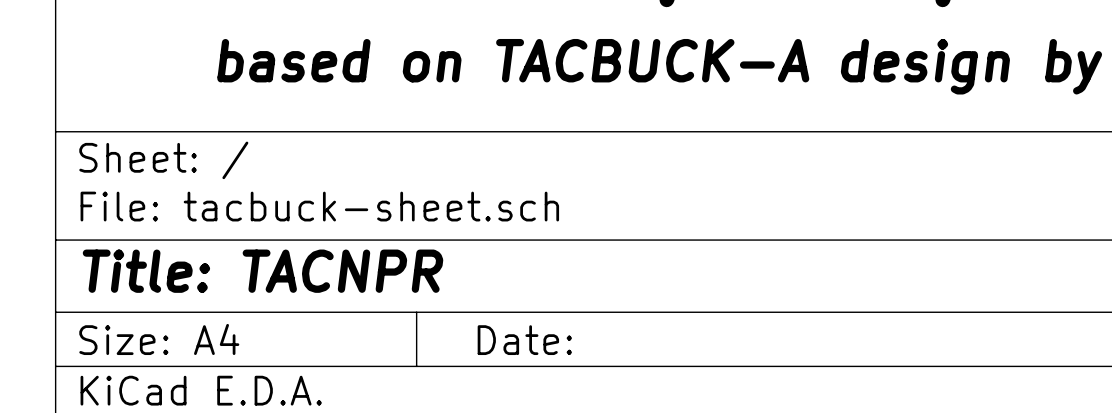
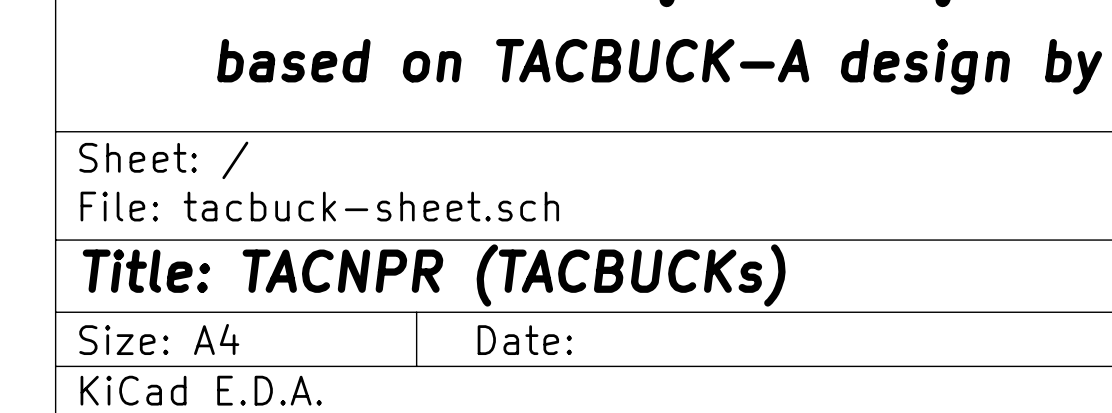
title block: Title: TACNPR (263, 271) -> Title: TACNPR (TACBUCKs) (434, 275)

